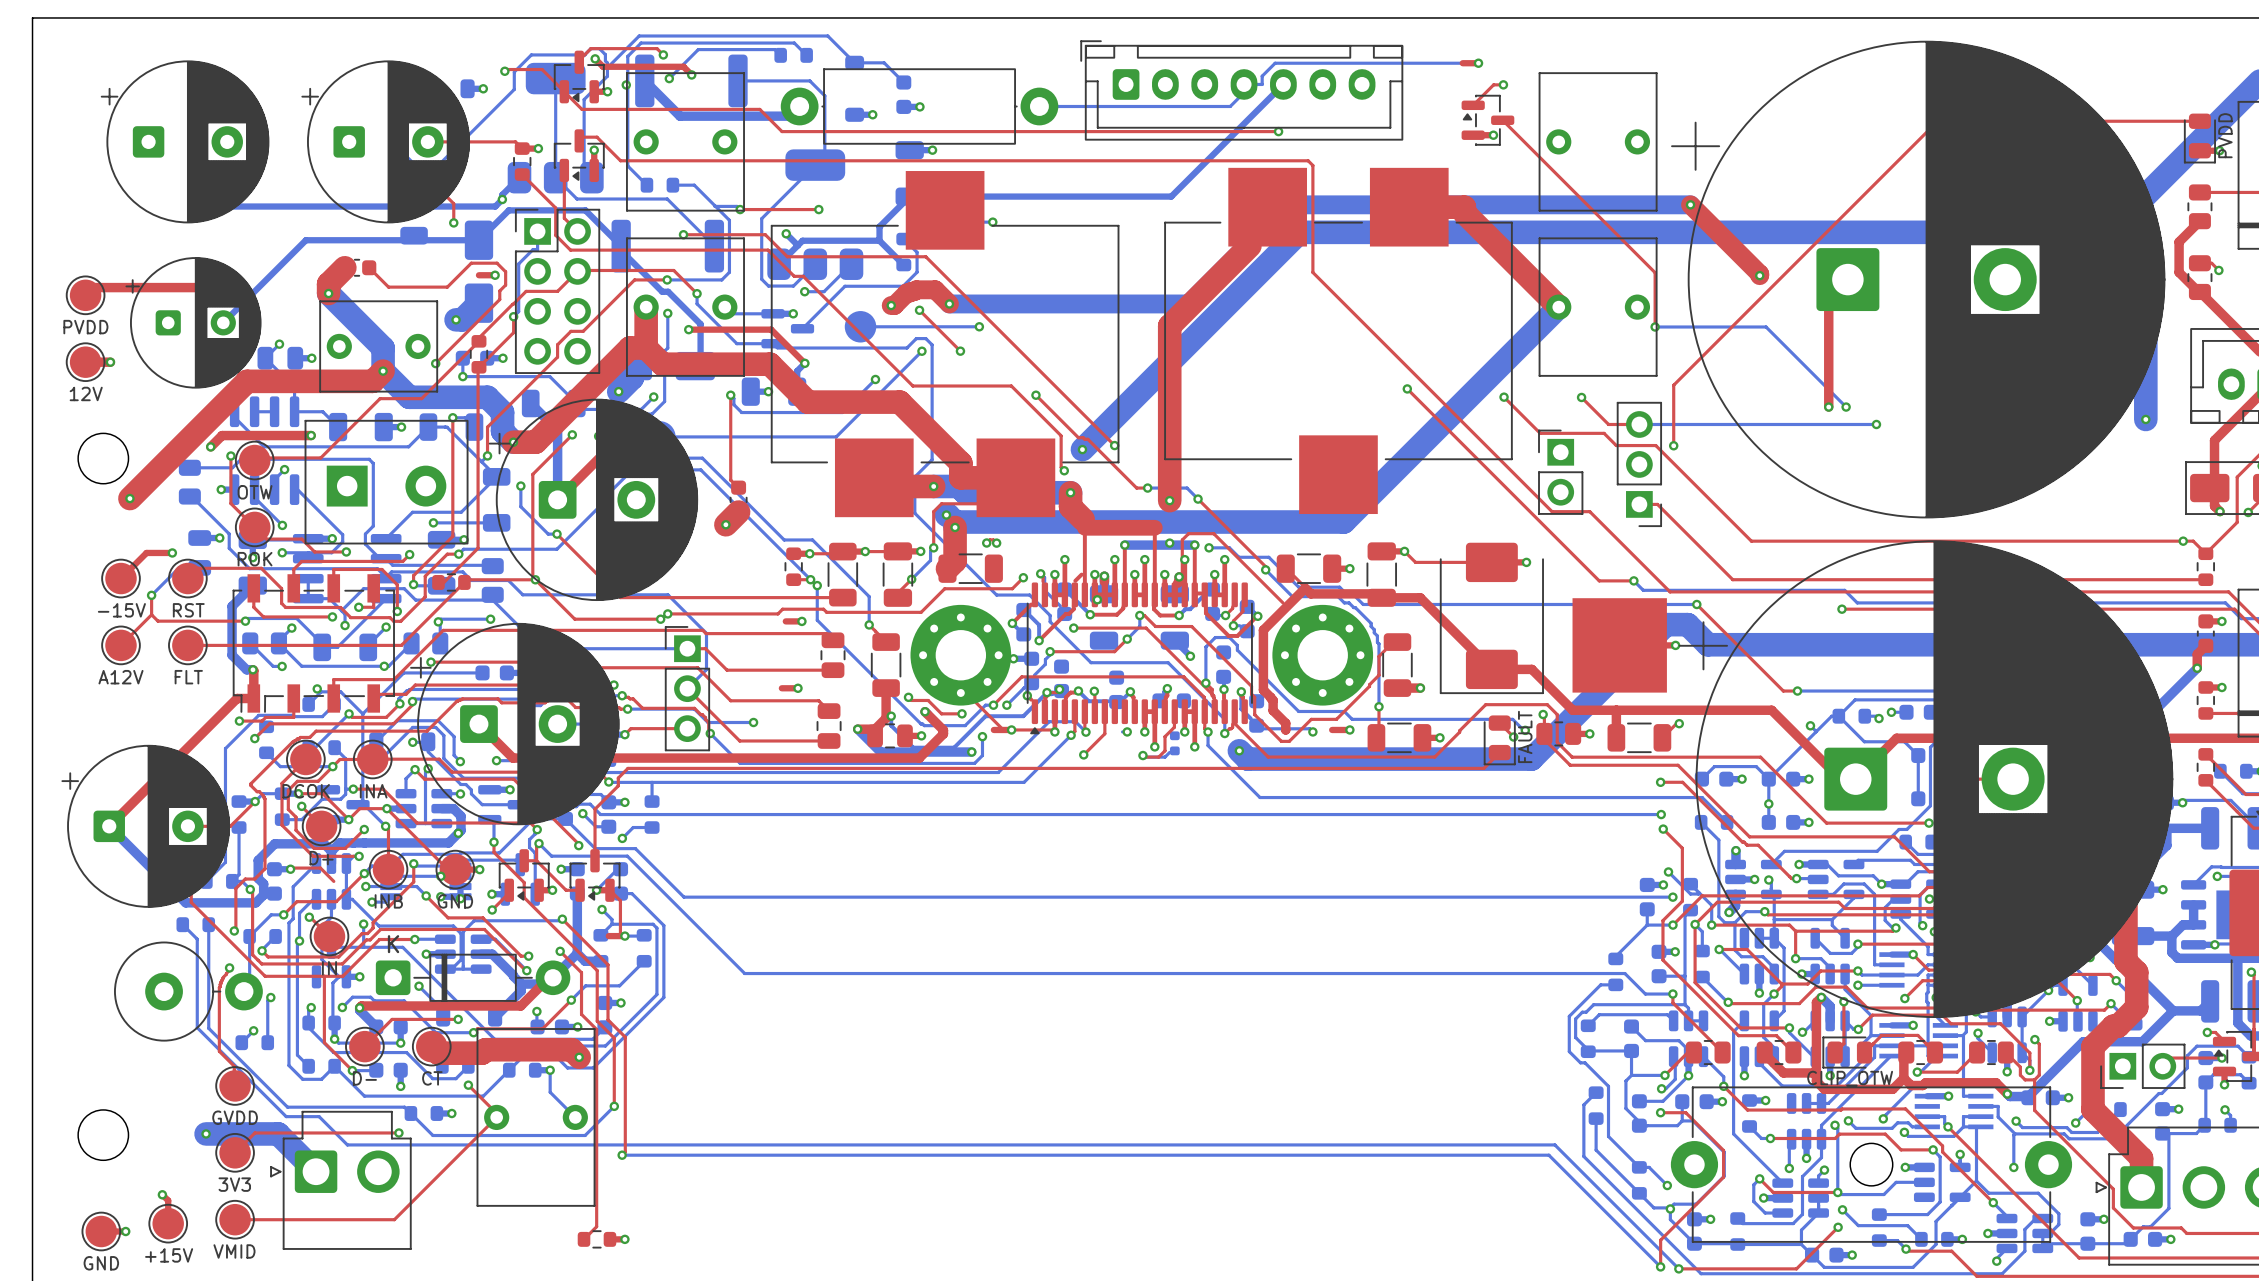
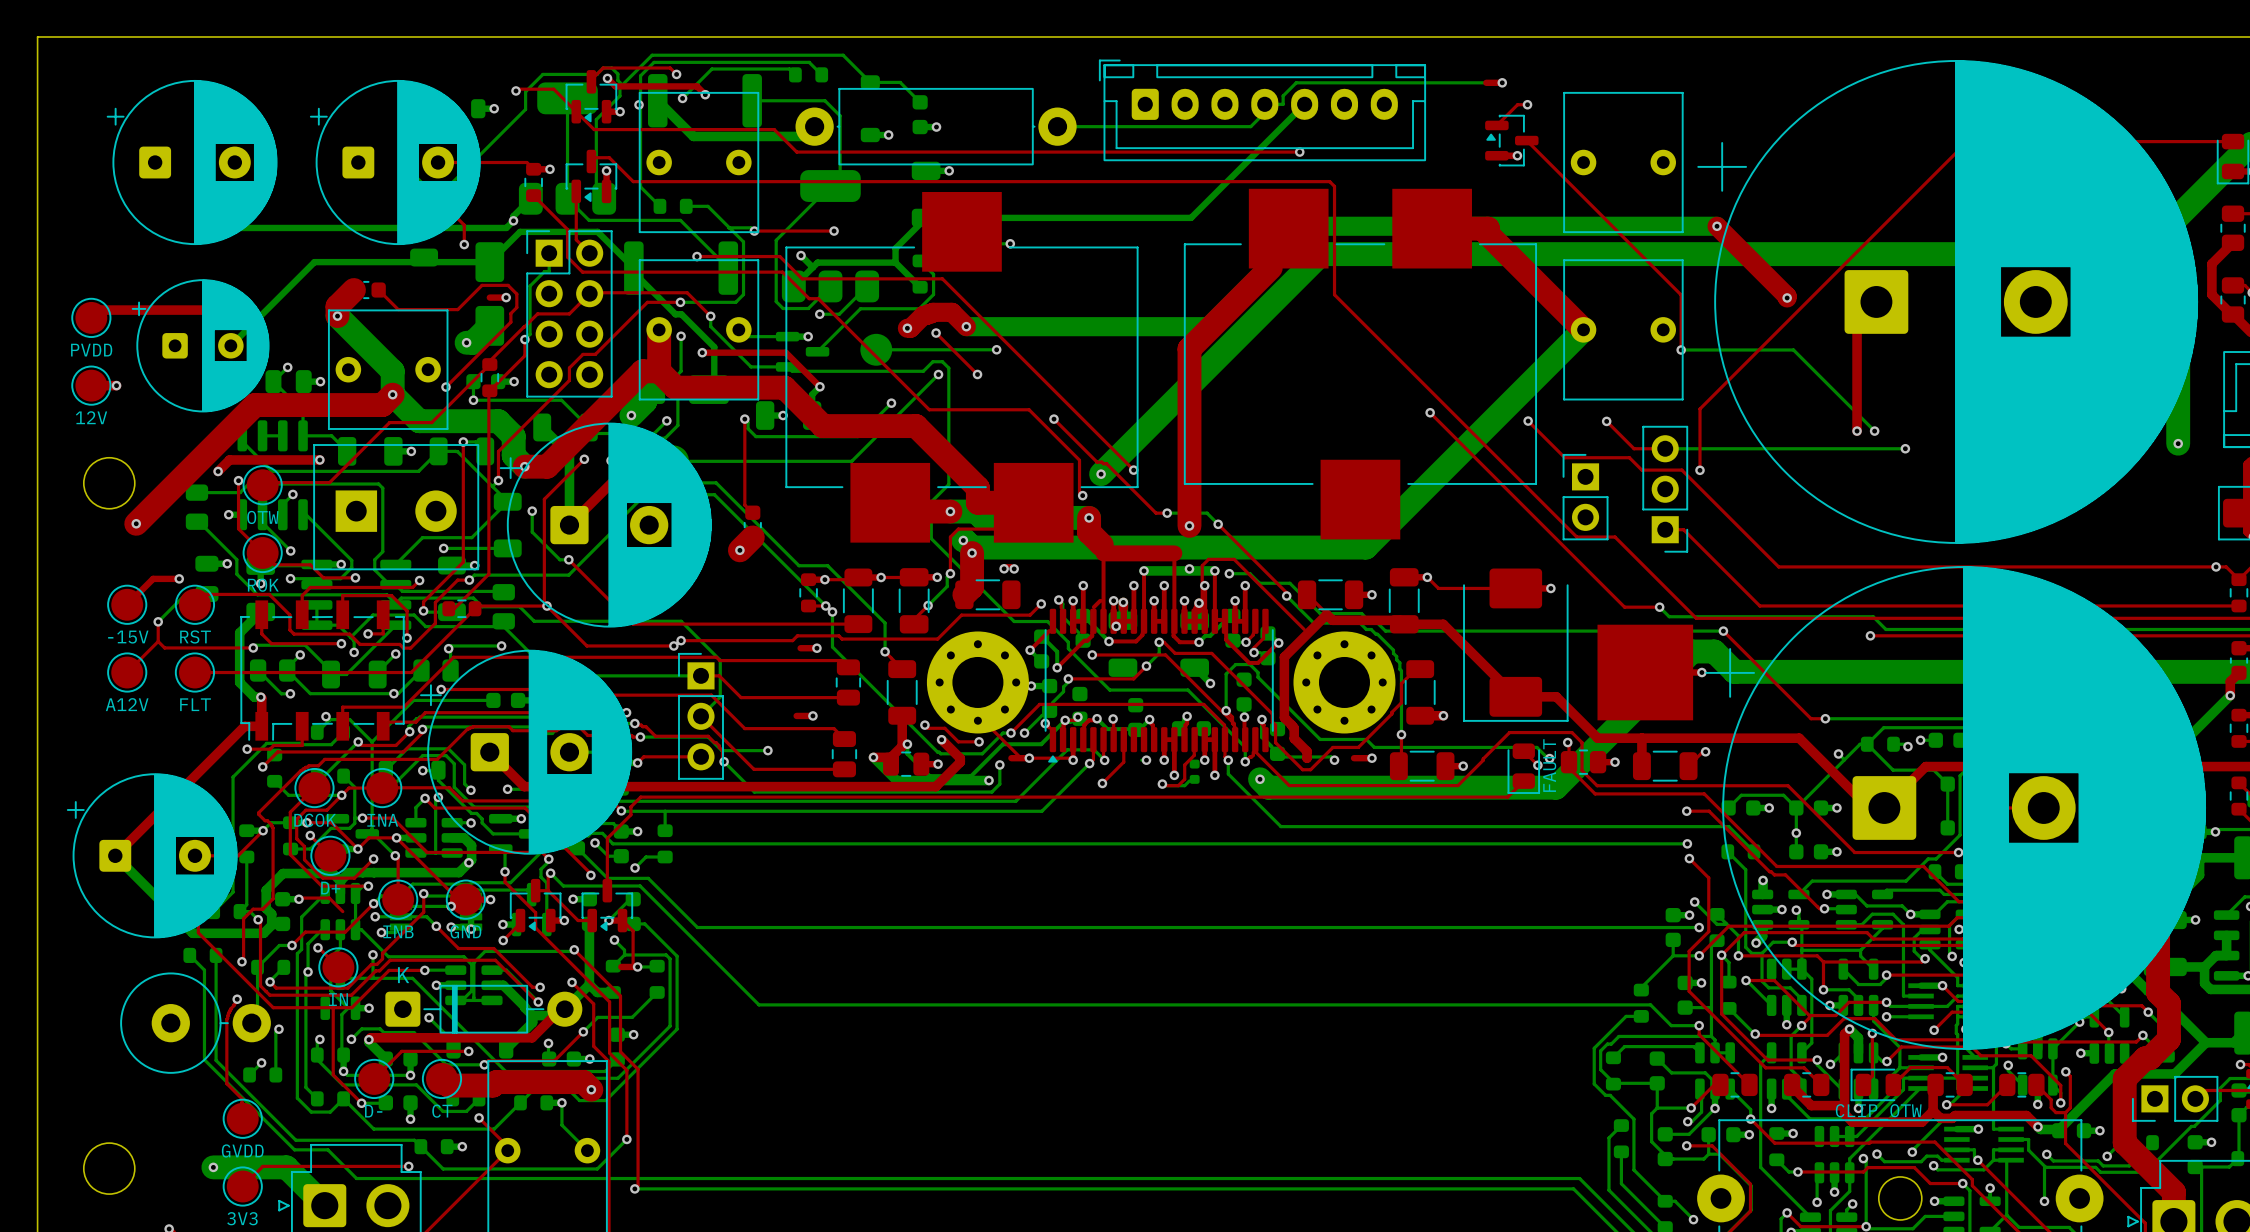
part footprint: [319, 300, 439, 393] -> [327, 309, 449, 430]

